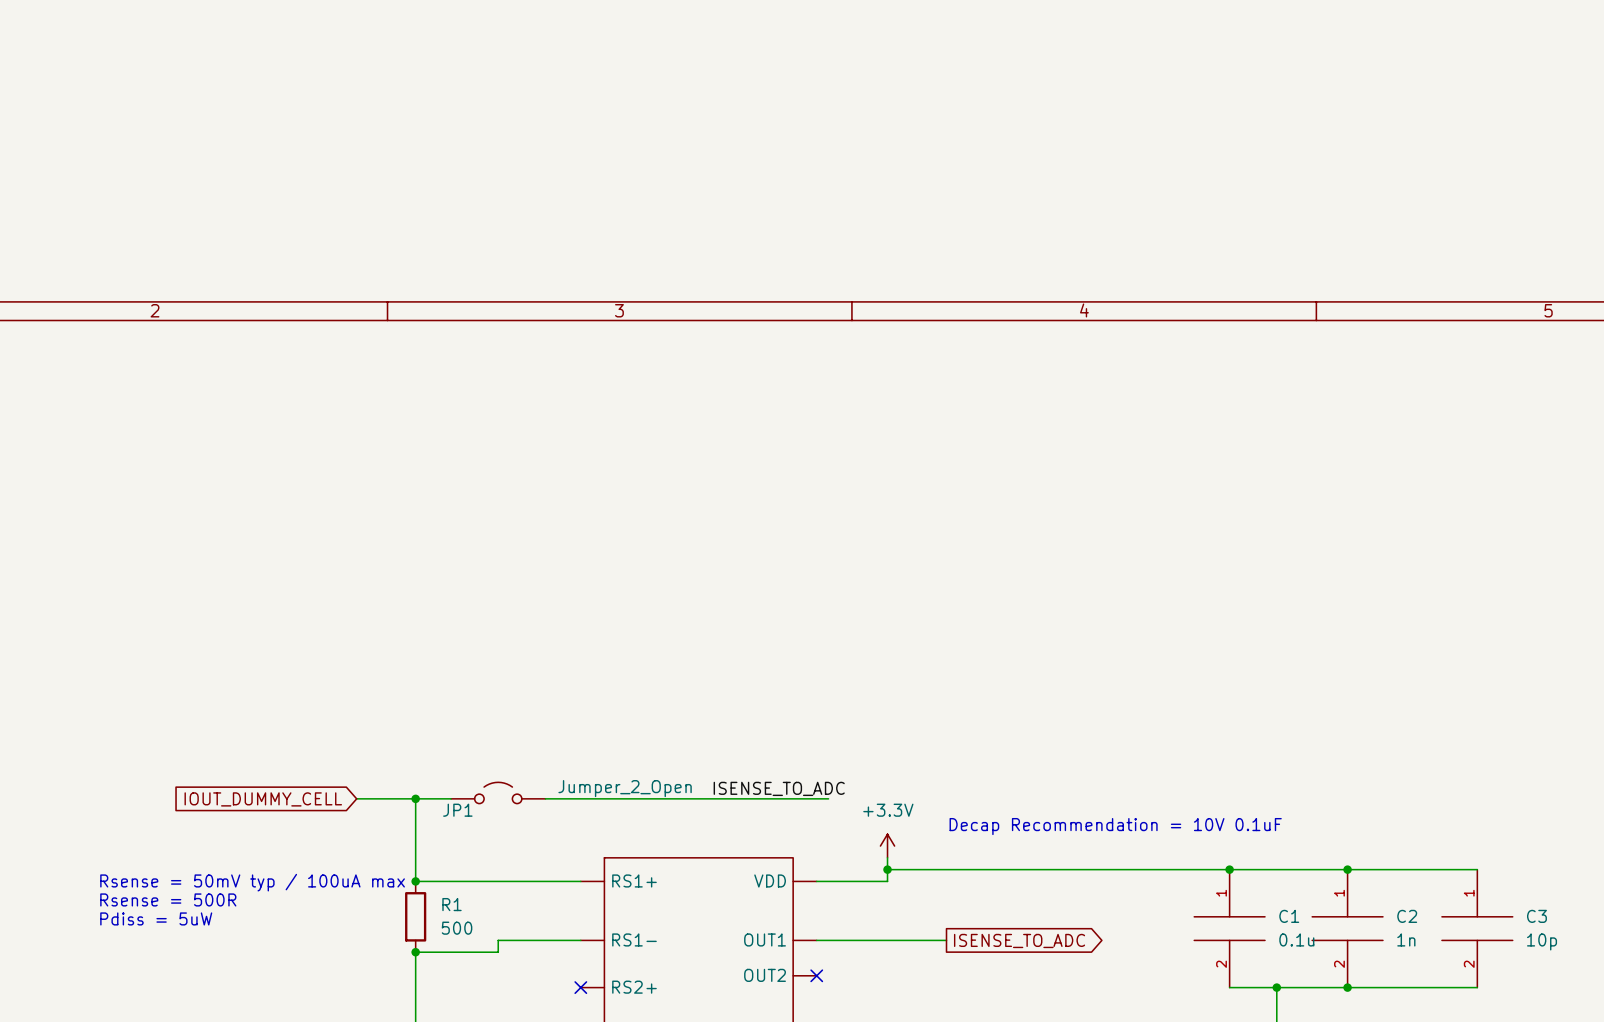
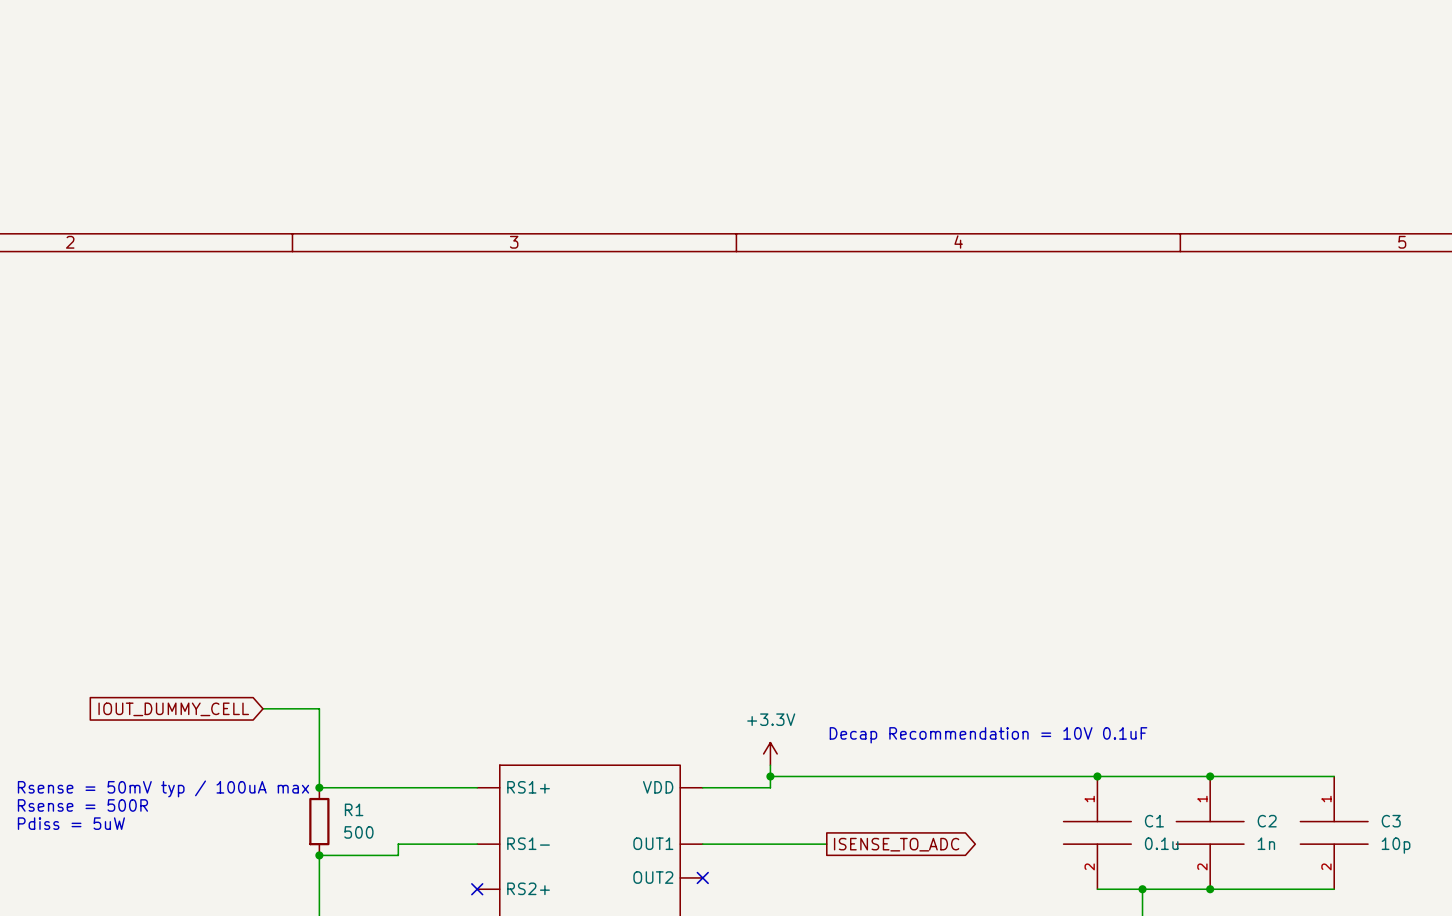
label: ISENSE_TO_ADC (779, 788) -> none
JP1: Jumper_2_Open (498, 792) -> none
wire: (415, 798) (451, 798) -> none
junction: (415, 798) -> none
wire: (545, 798) (828, 798) -> none

